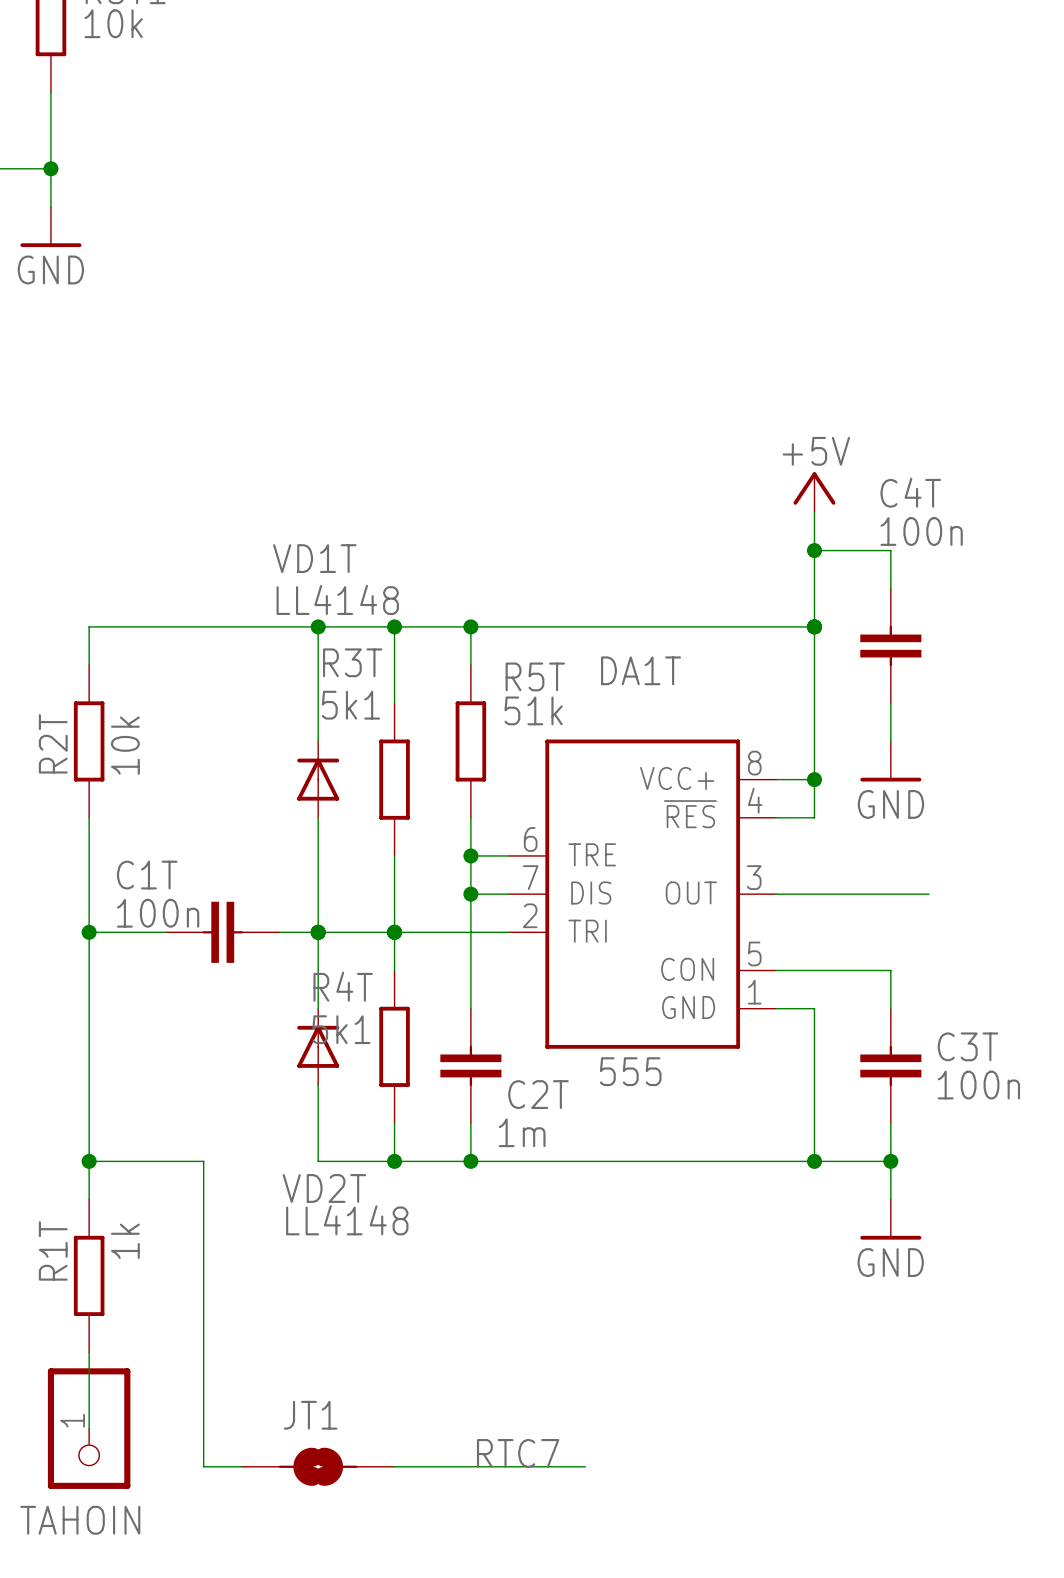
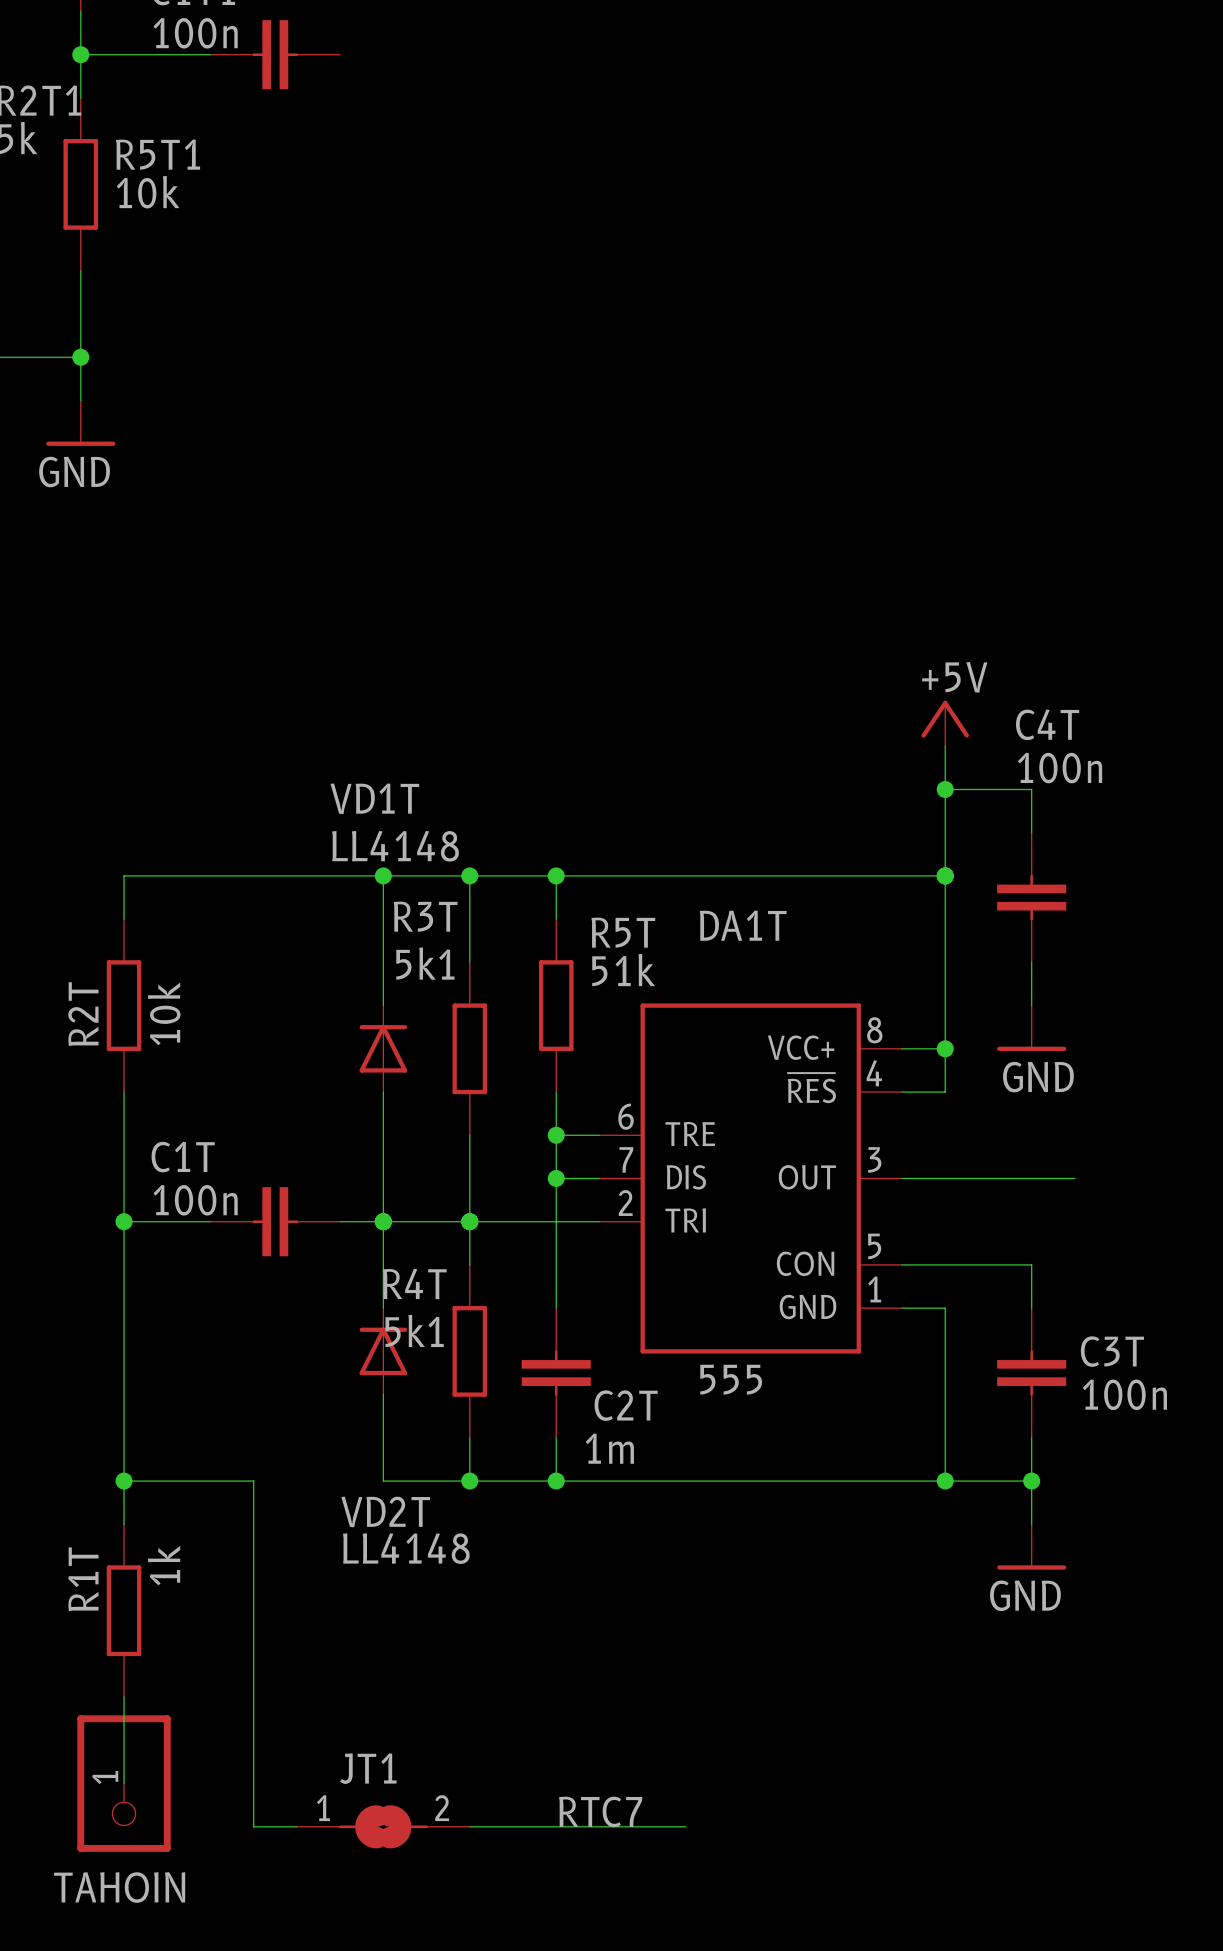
JT1 pin number: none -> 1 (323, 1808)
JT1 pin number: none -> 2 (442, 1808)

